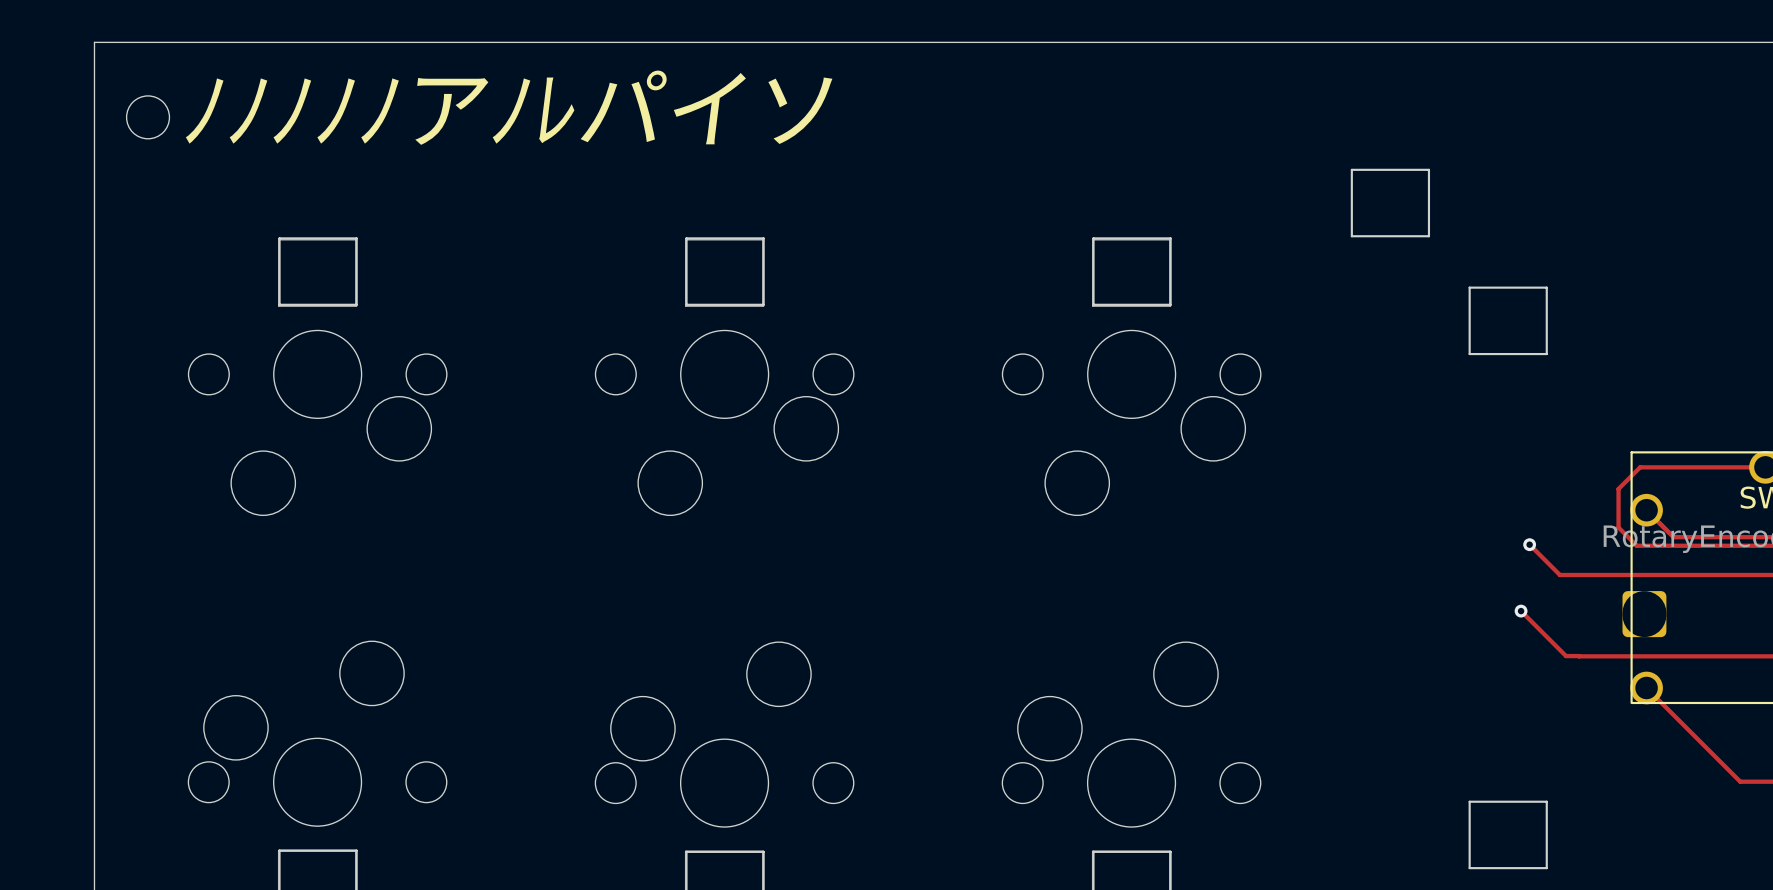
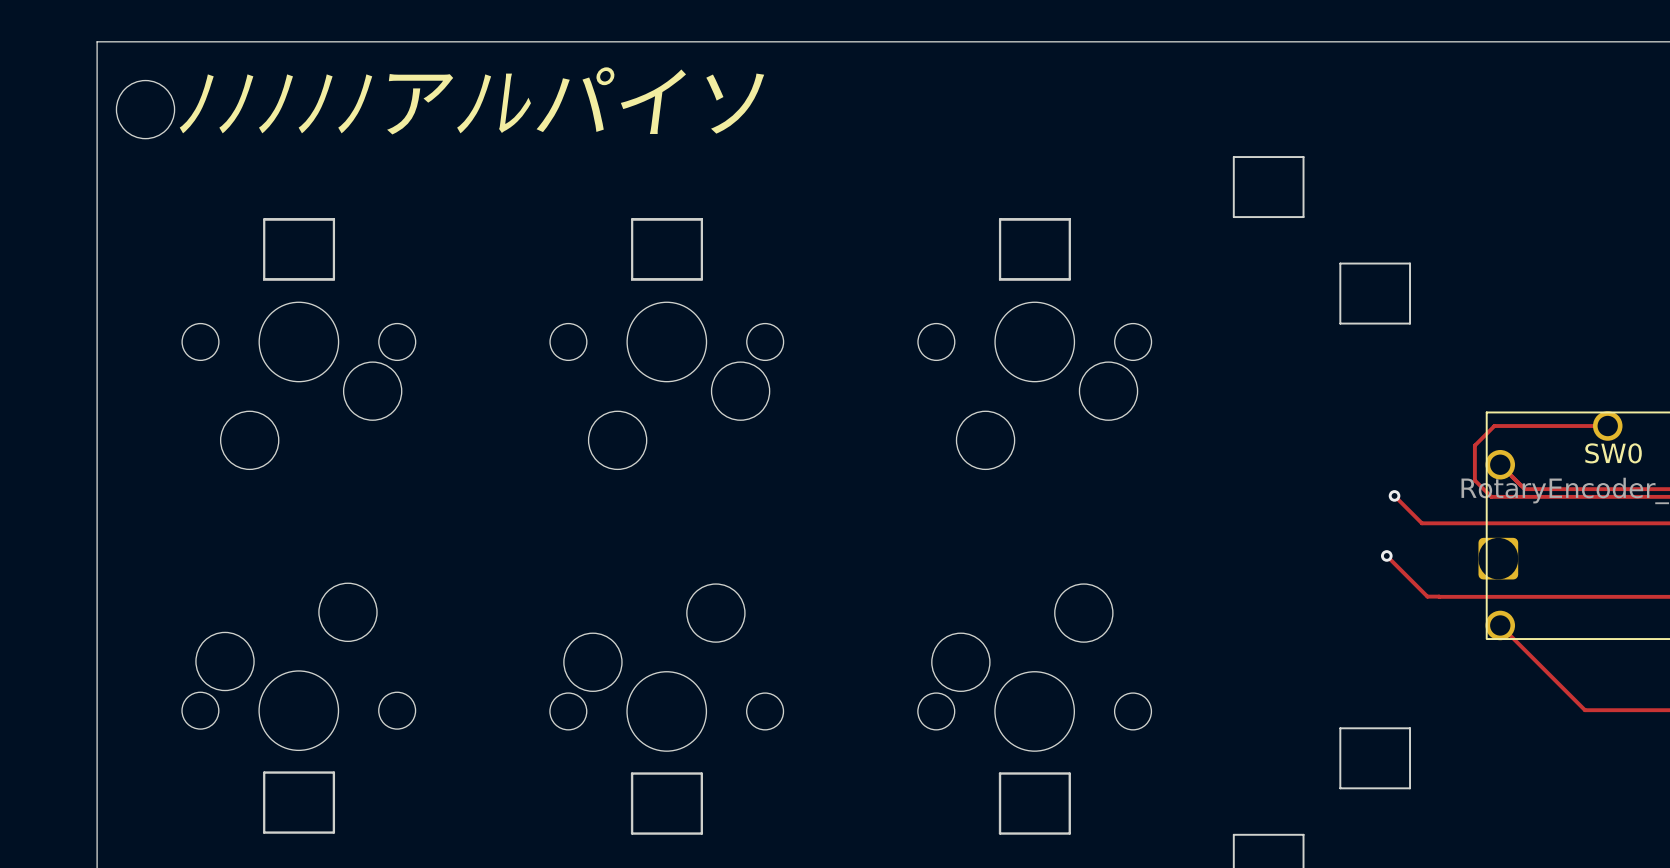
round board edge size: [126, 95, 170, 140] -> [115, 80, 176, 140]

